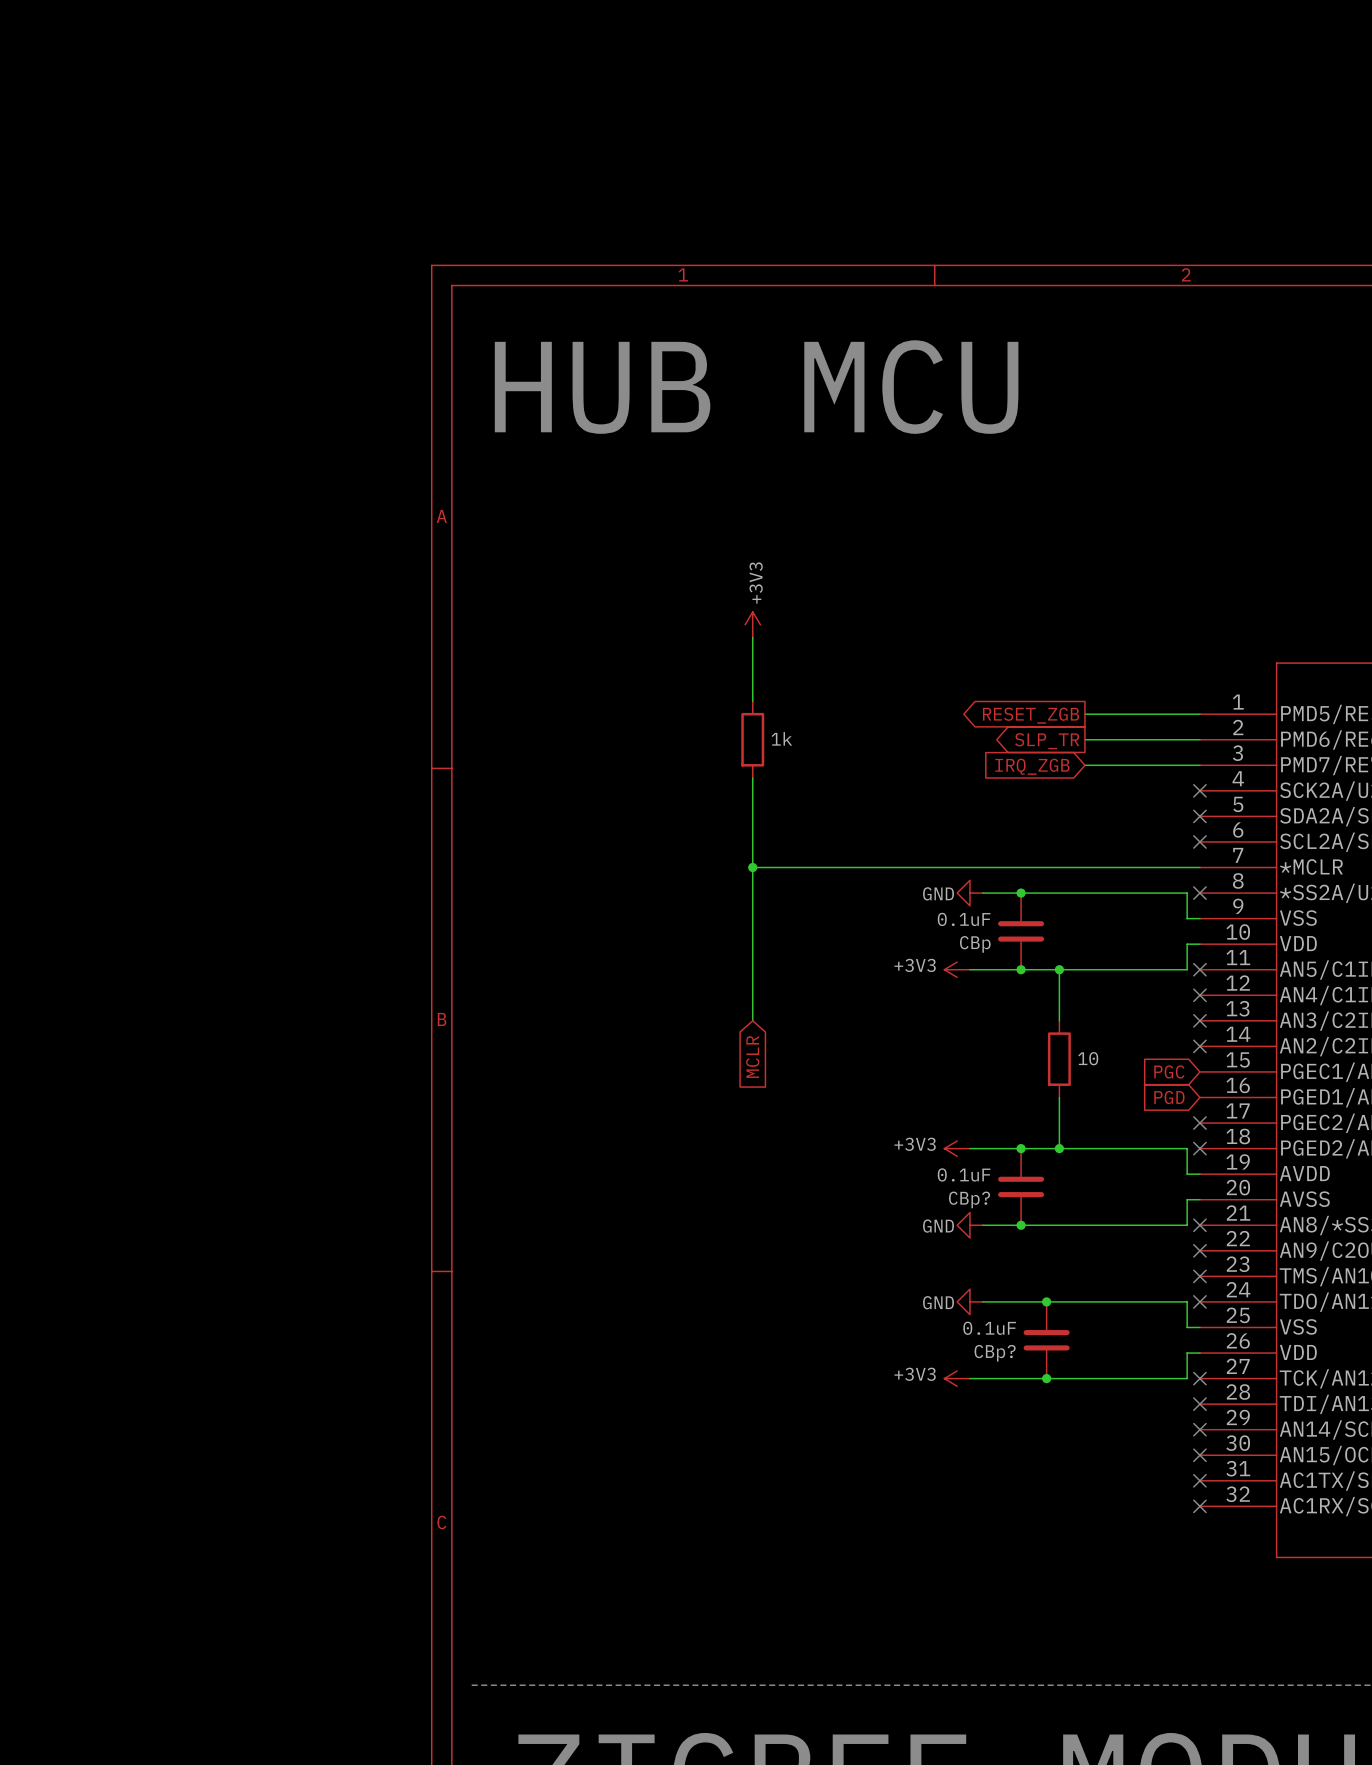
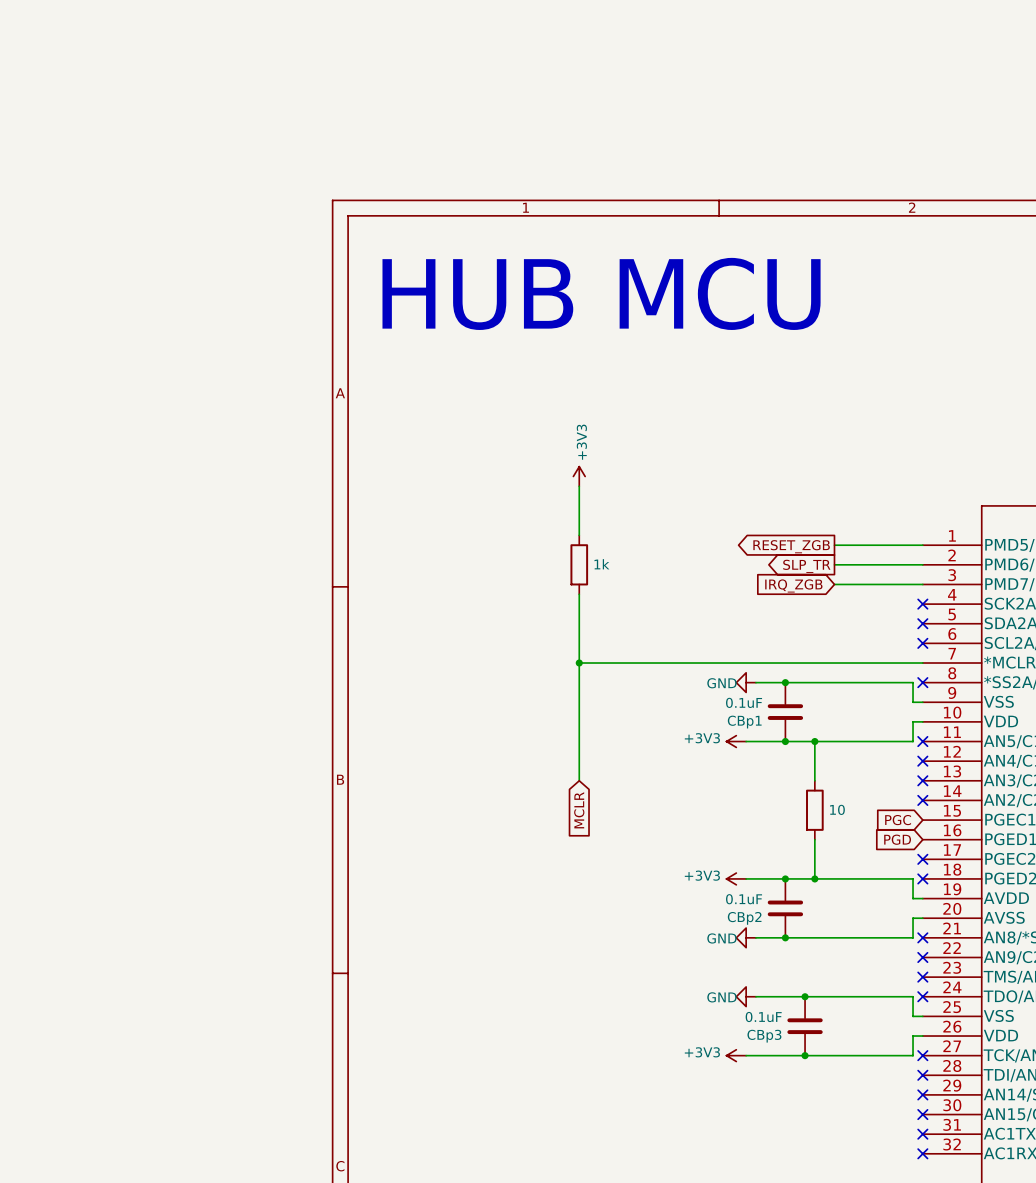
CBp name: CBp (975, 944) -> CBp1 (744, 722)
CBp? name: CBp? (969, 1199) -> CBp2 (744, 918)
CBp? name: CBp? (995, 1353) -> CBp3 (764, 1036)

